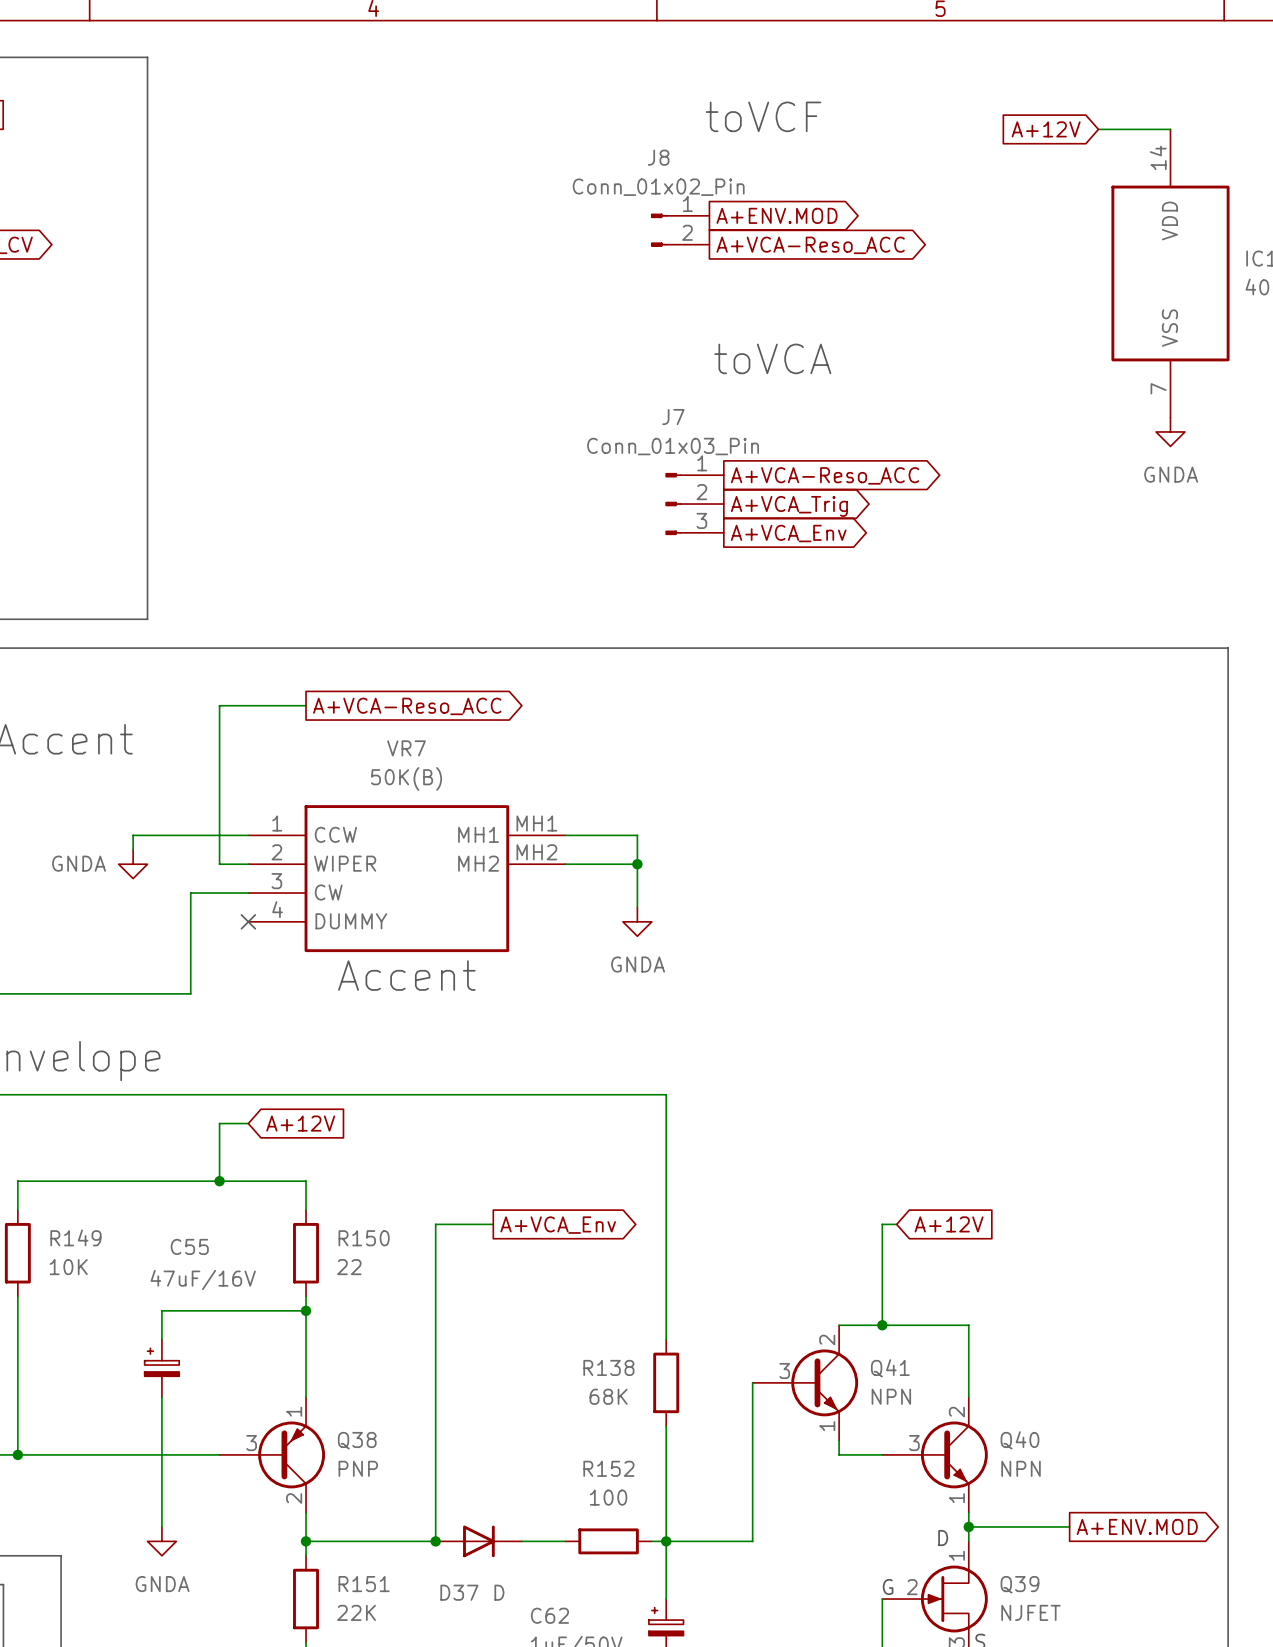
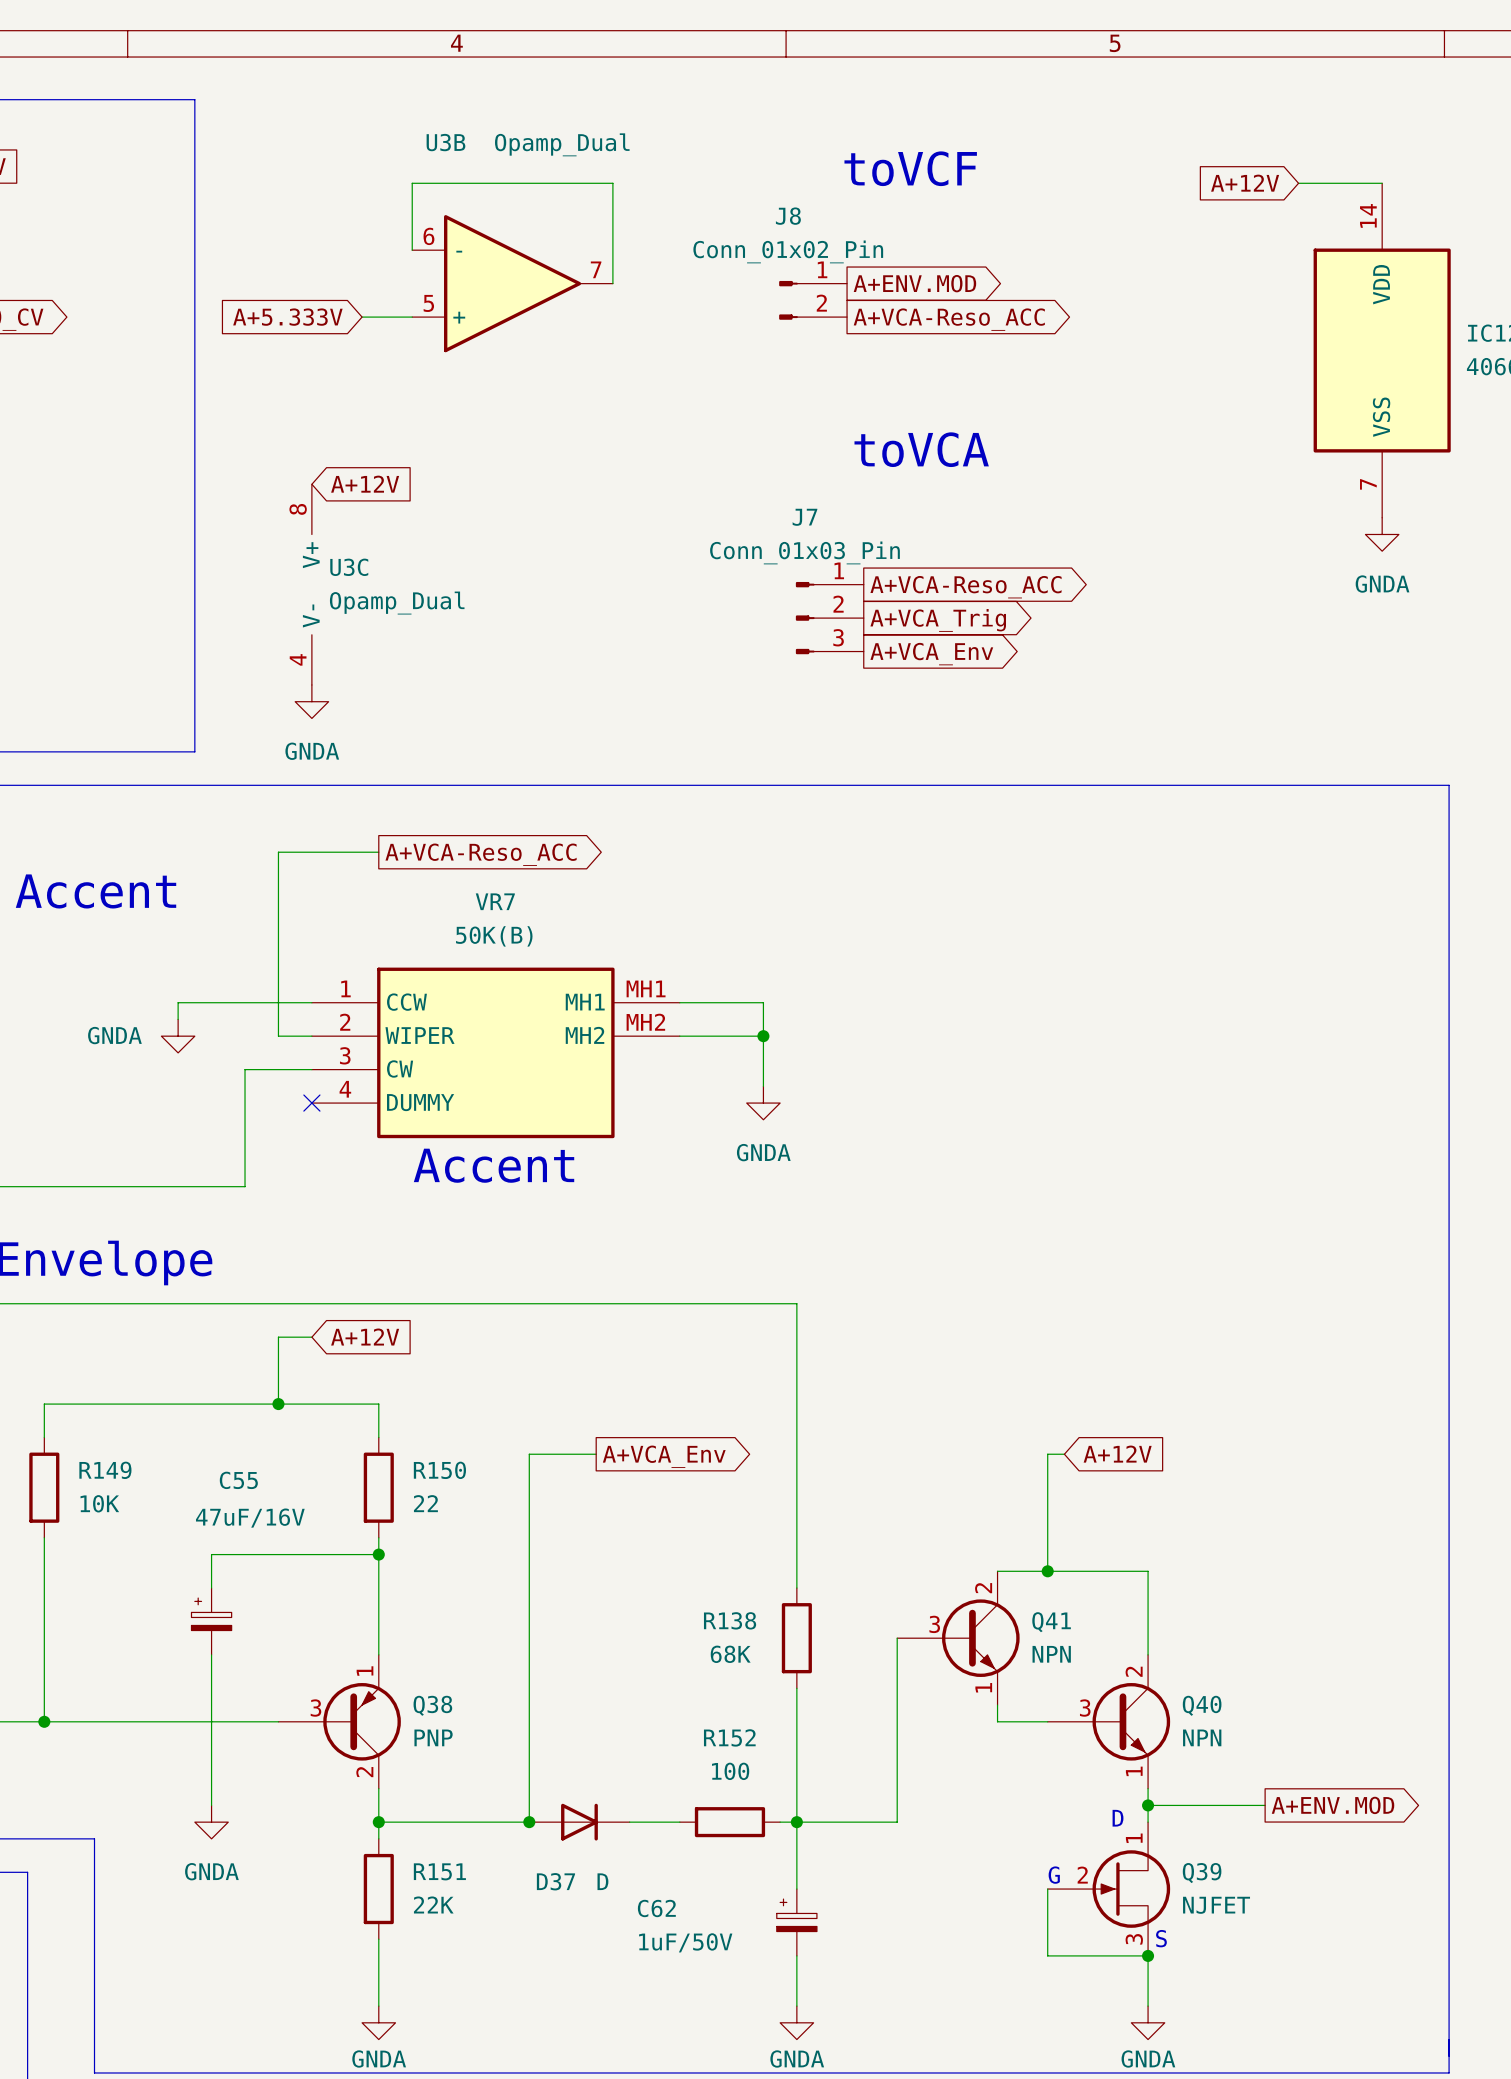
wire: none -> (412, 250) (412, 183) (612, 183) (612, 283)
U3B: none -> Opamp_Dual (512, 283)
global label: none -> A+5.333V (287, 317)
wire: none -> (362, 317) (412, 317)
global label: none -> A+12V (365, 484)
U3C: none -> Opamp_Dual (311, 584)
power symbol: none -> GNDA (311, 701)

